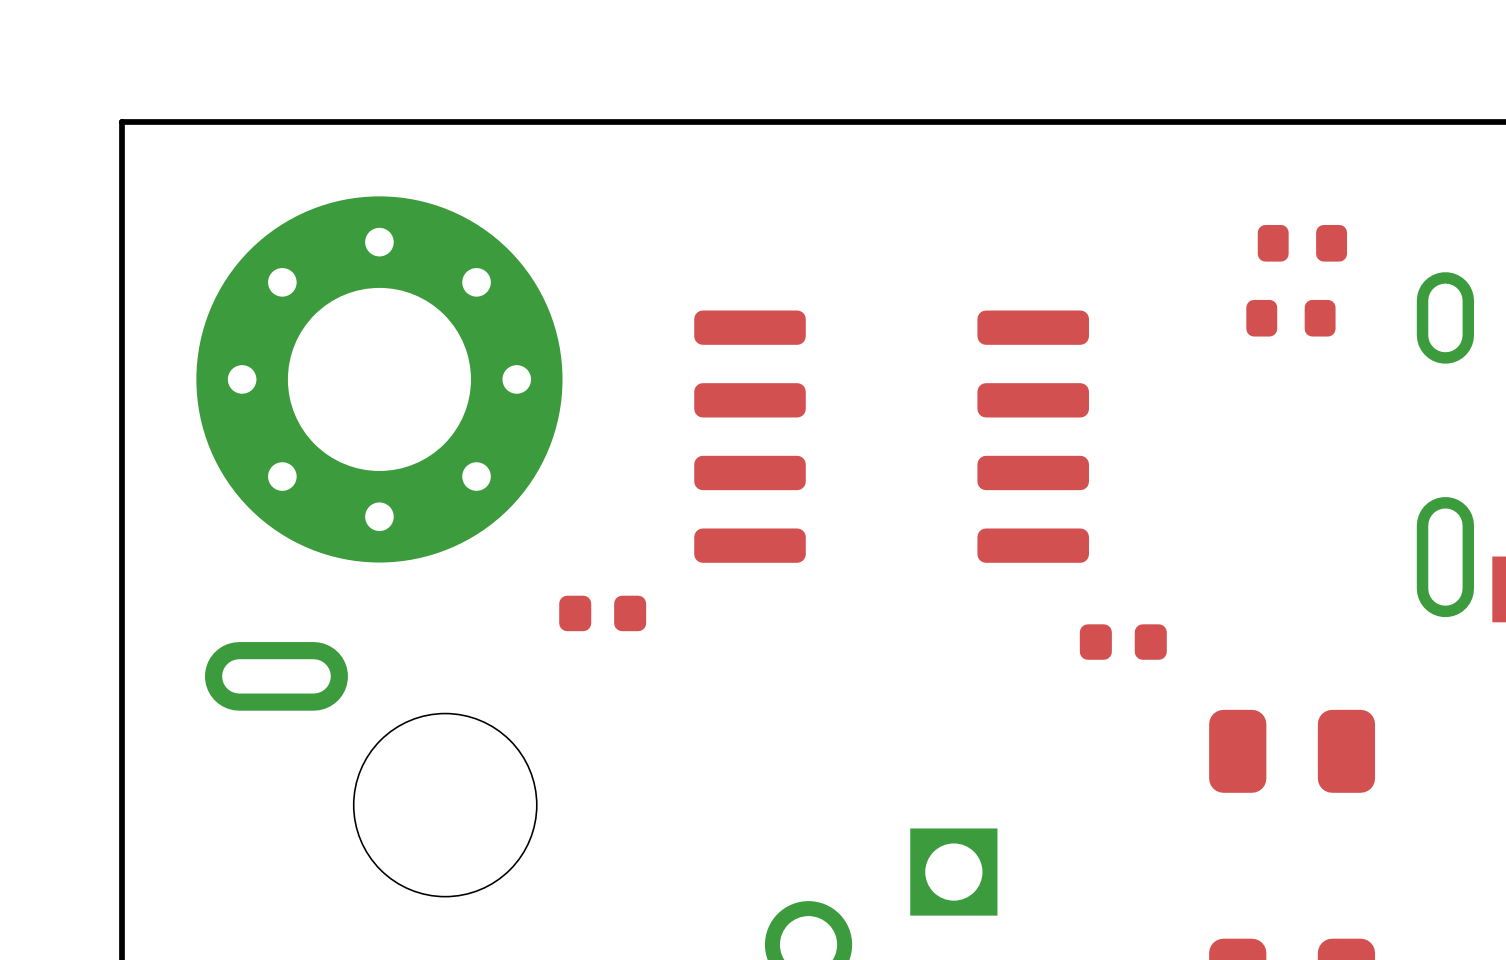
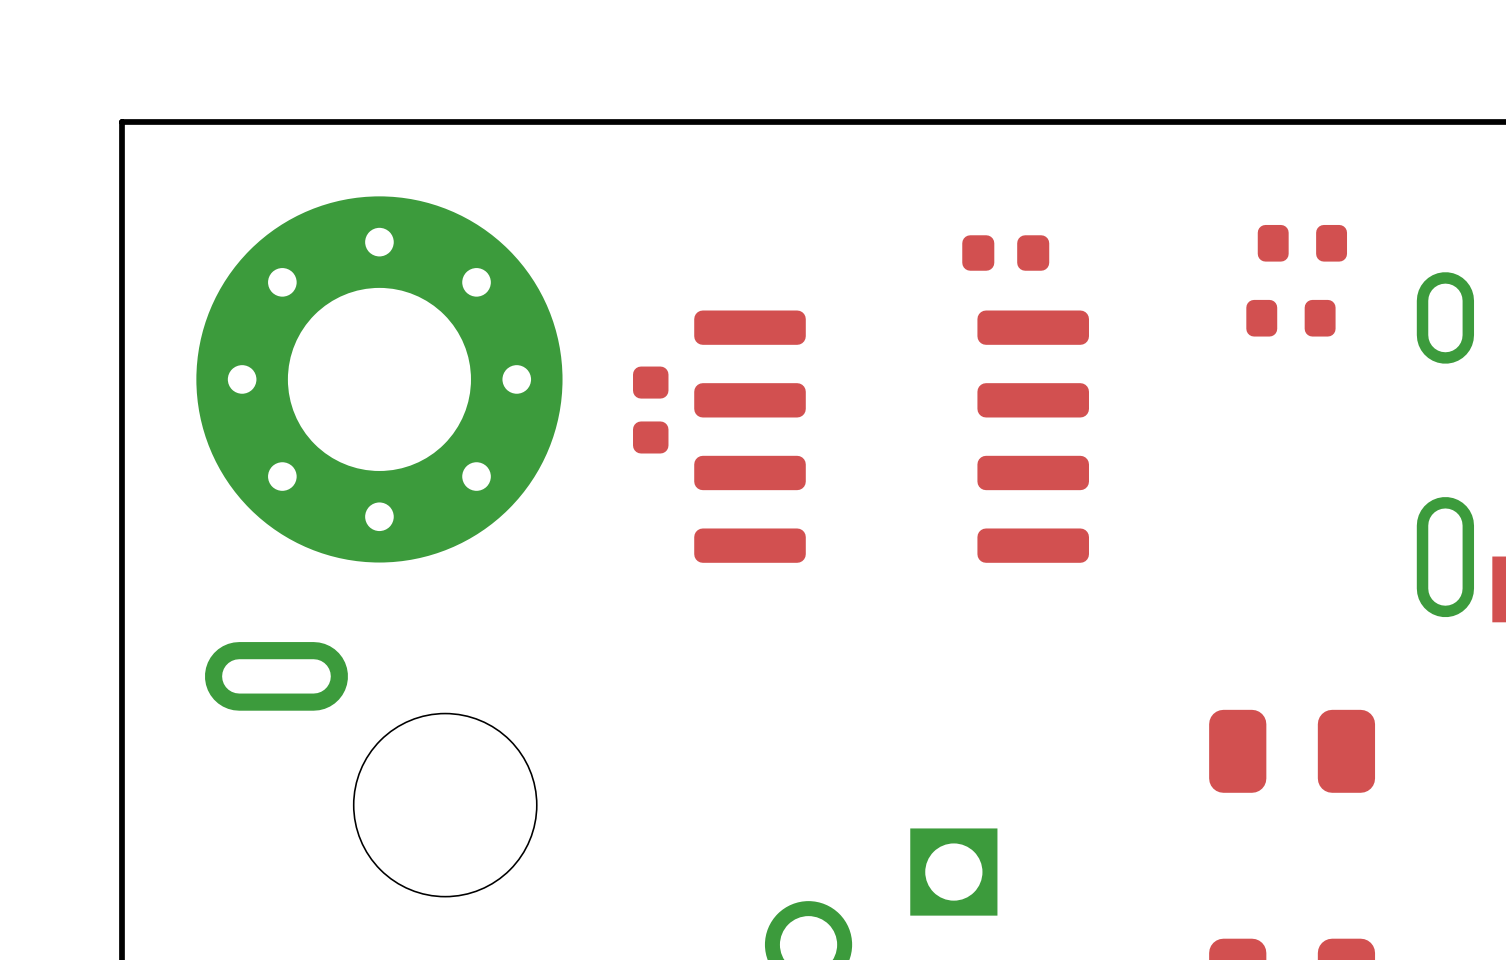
part: none -> (1005, 253)
part rotation: 0° (602, 613) -> 90° clockwise (650, 410)
part position: (602, 613) -> (650, 410)
part: (1123, 642) -> none

